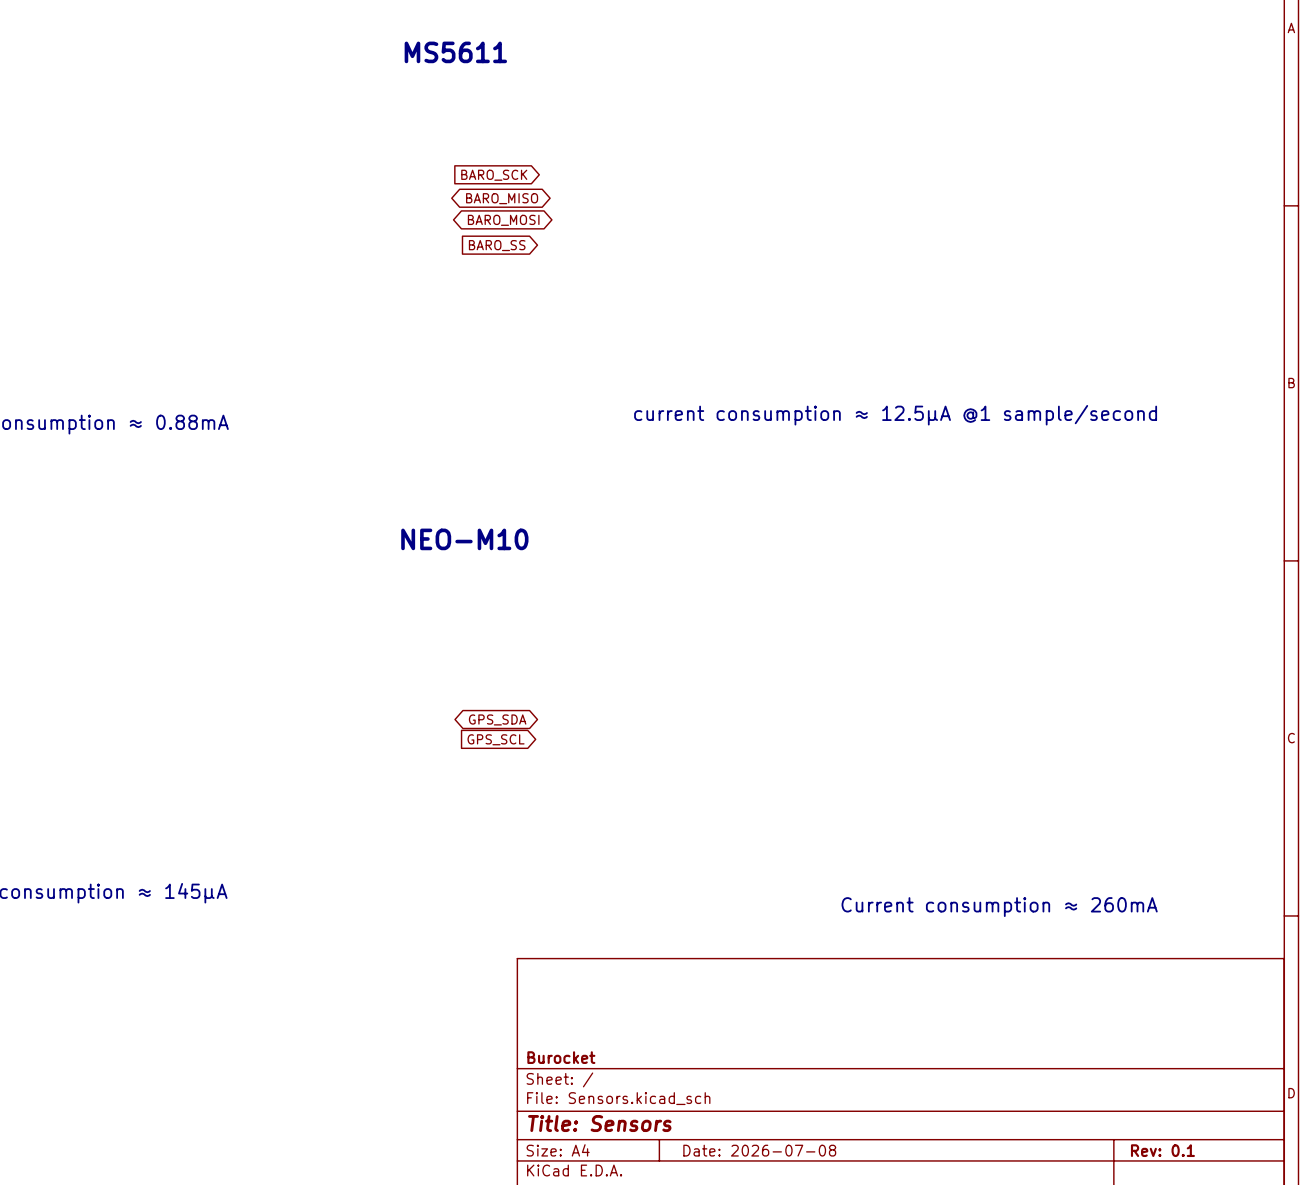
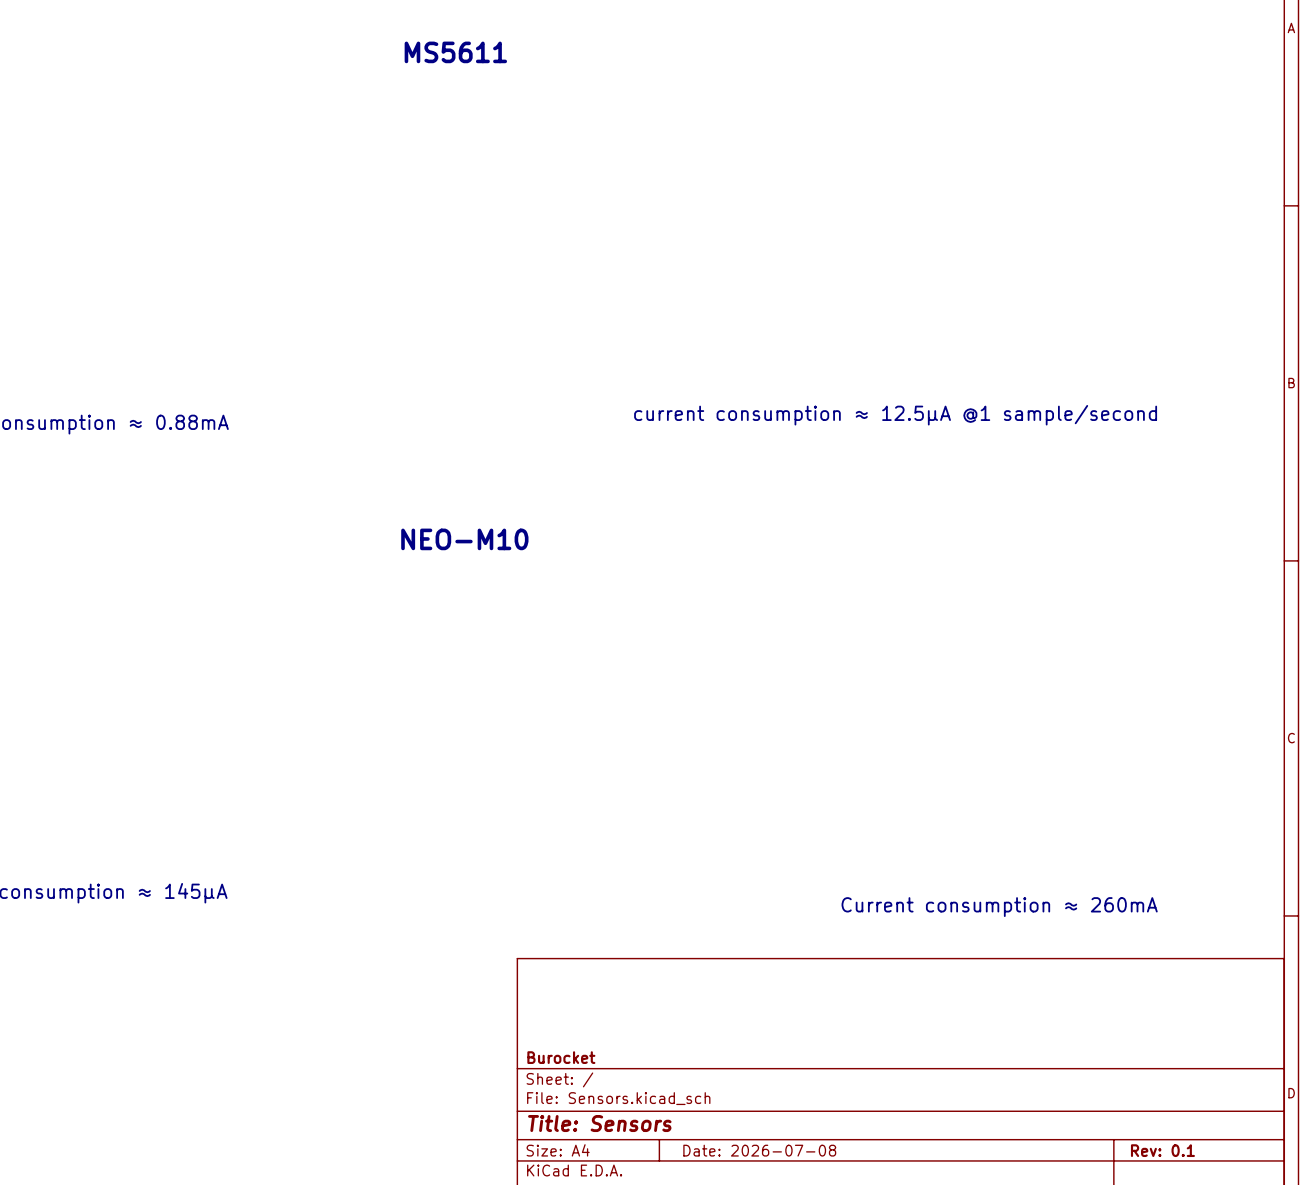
global label: BARO_SCK (494, 175) -> none
global label: BARO_MISO (502, 198) -> none
global label: BARO_MOSI (503, 220) -> none
global label: BARO_SS (497, 245) -> none
global label: GPS_SDA (497, 719) -> none
global label: GPS_SCL (496, 739) -> none

